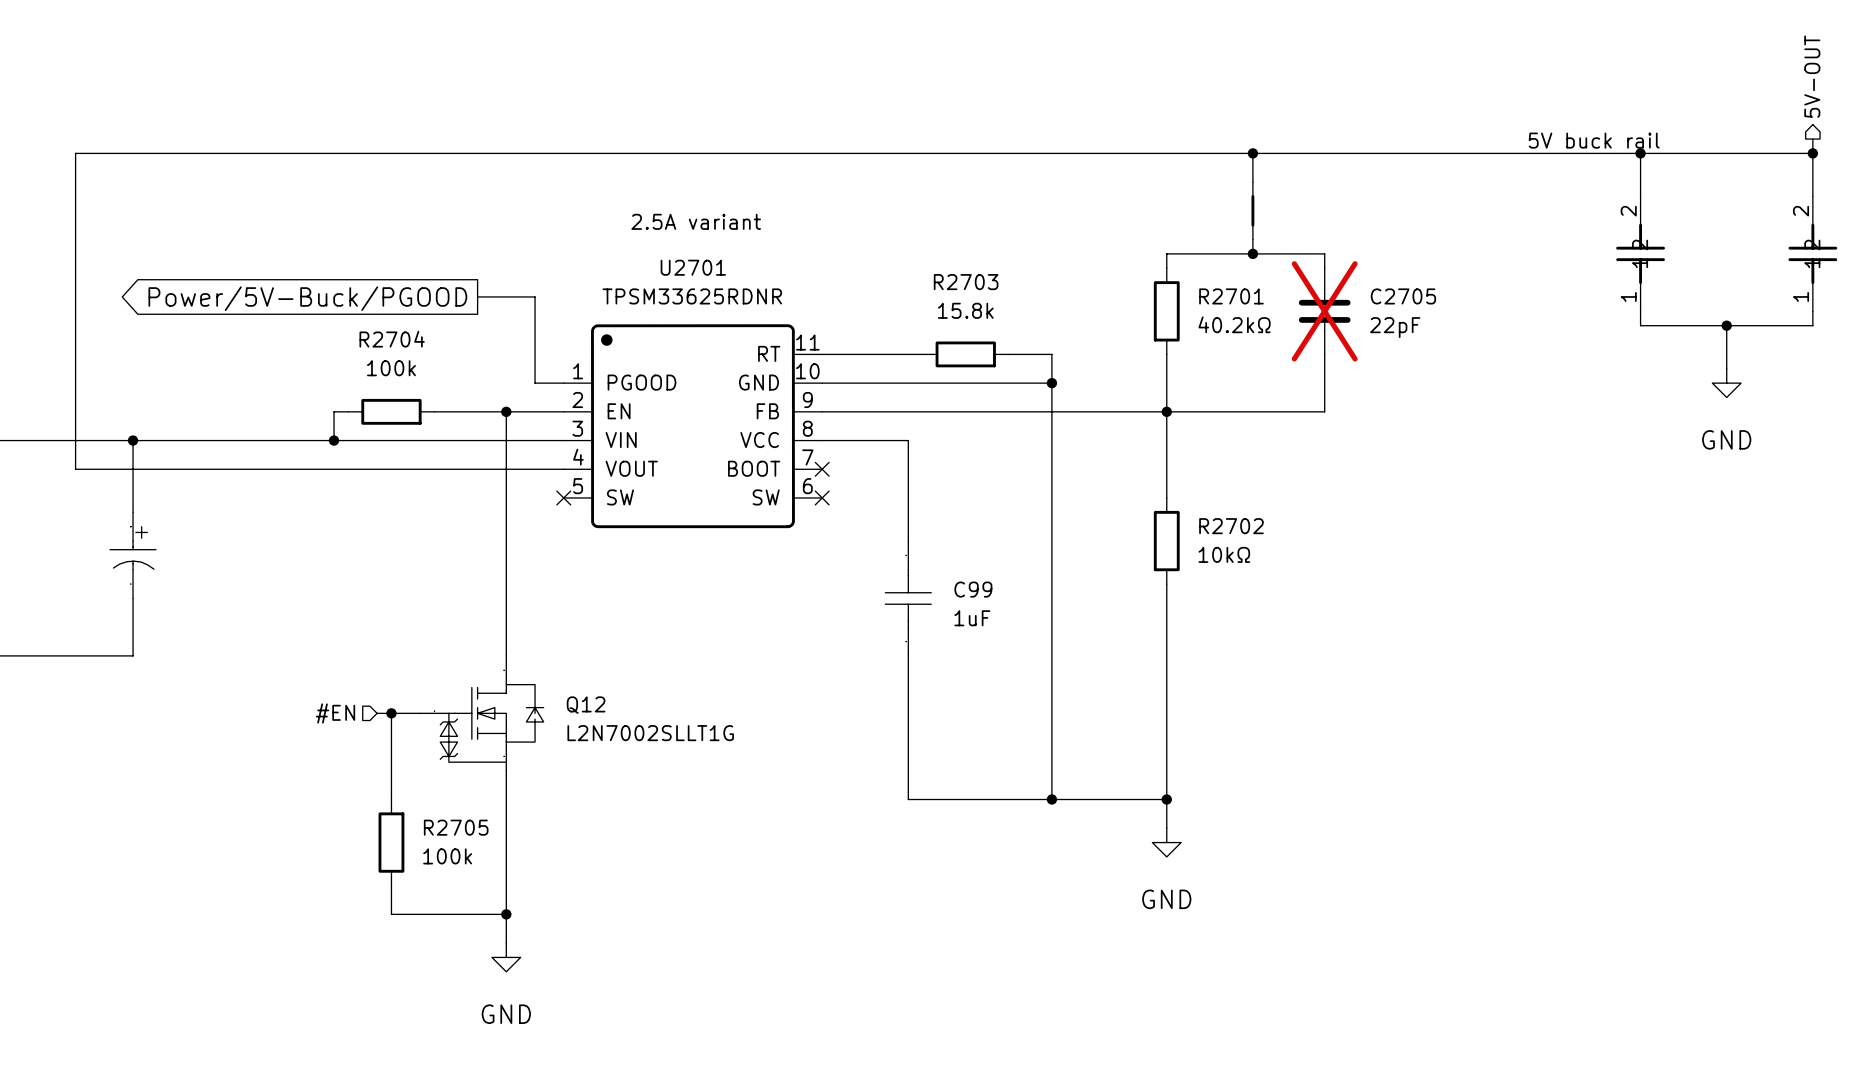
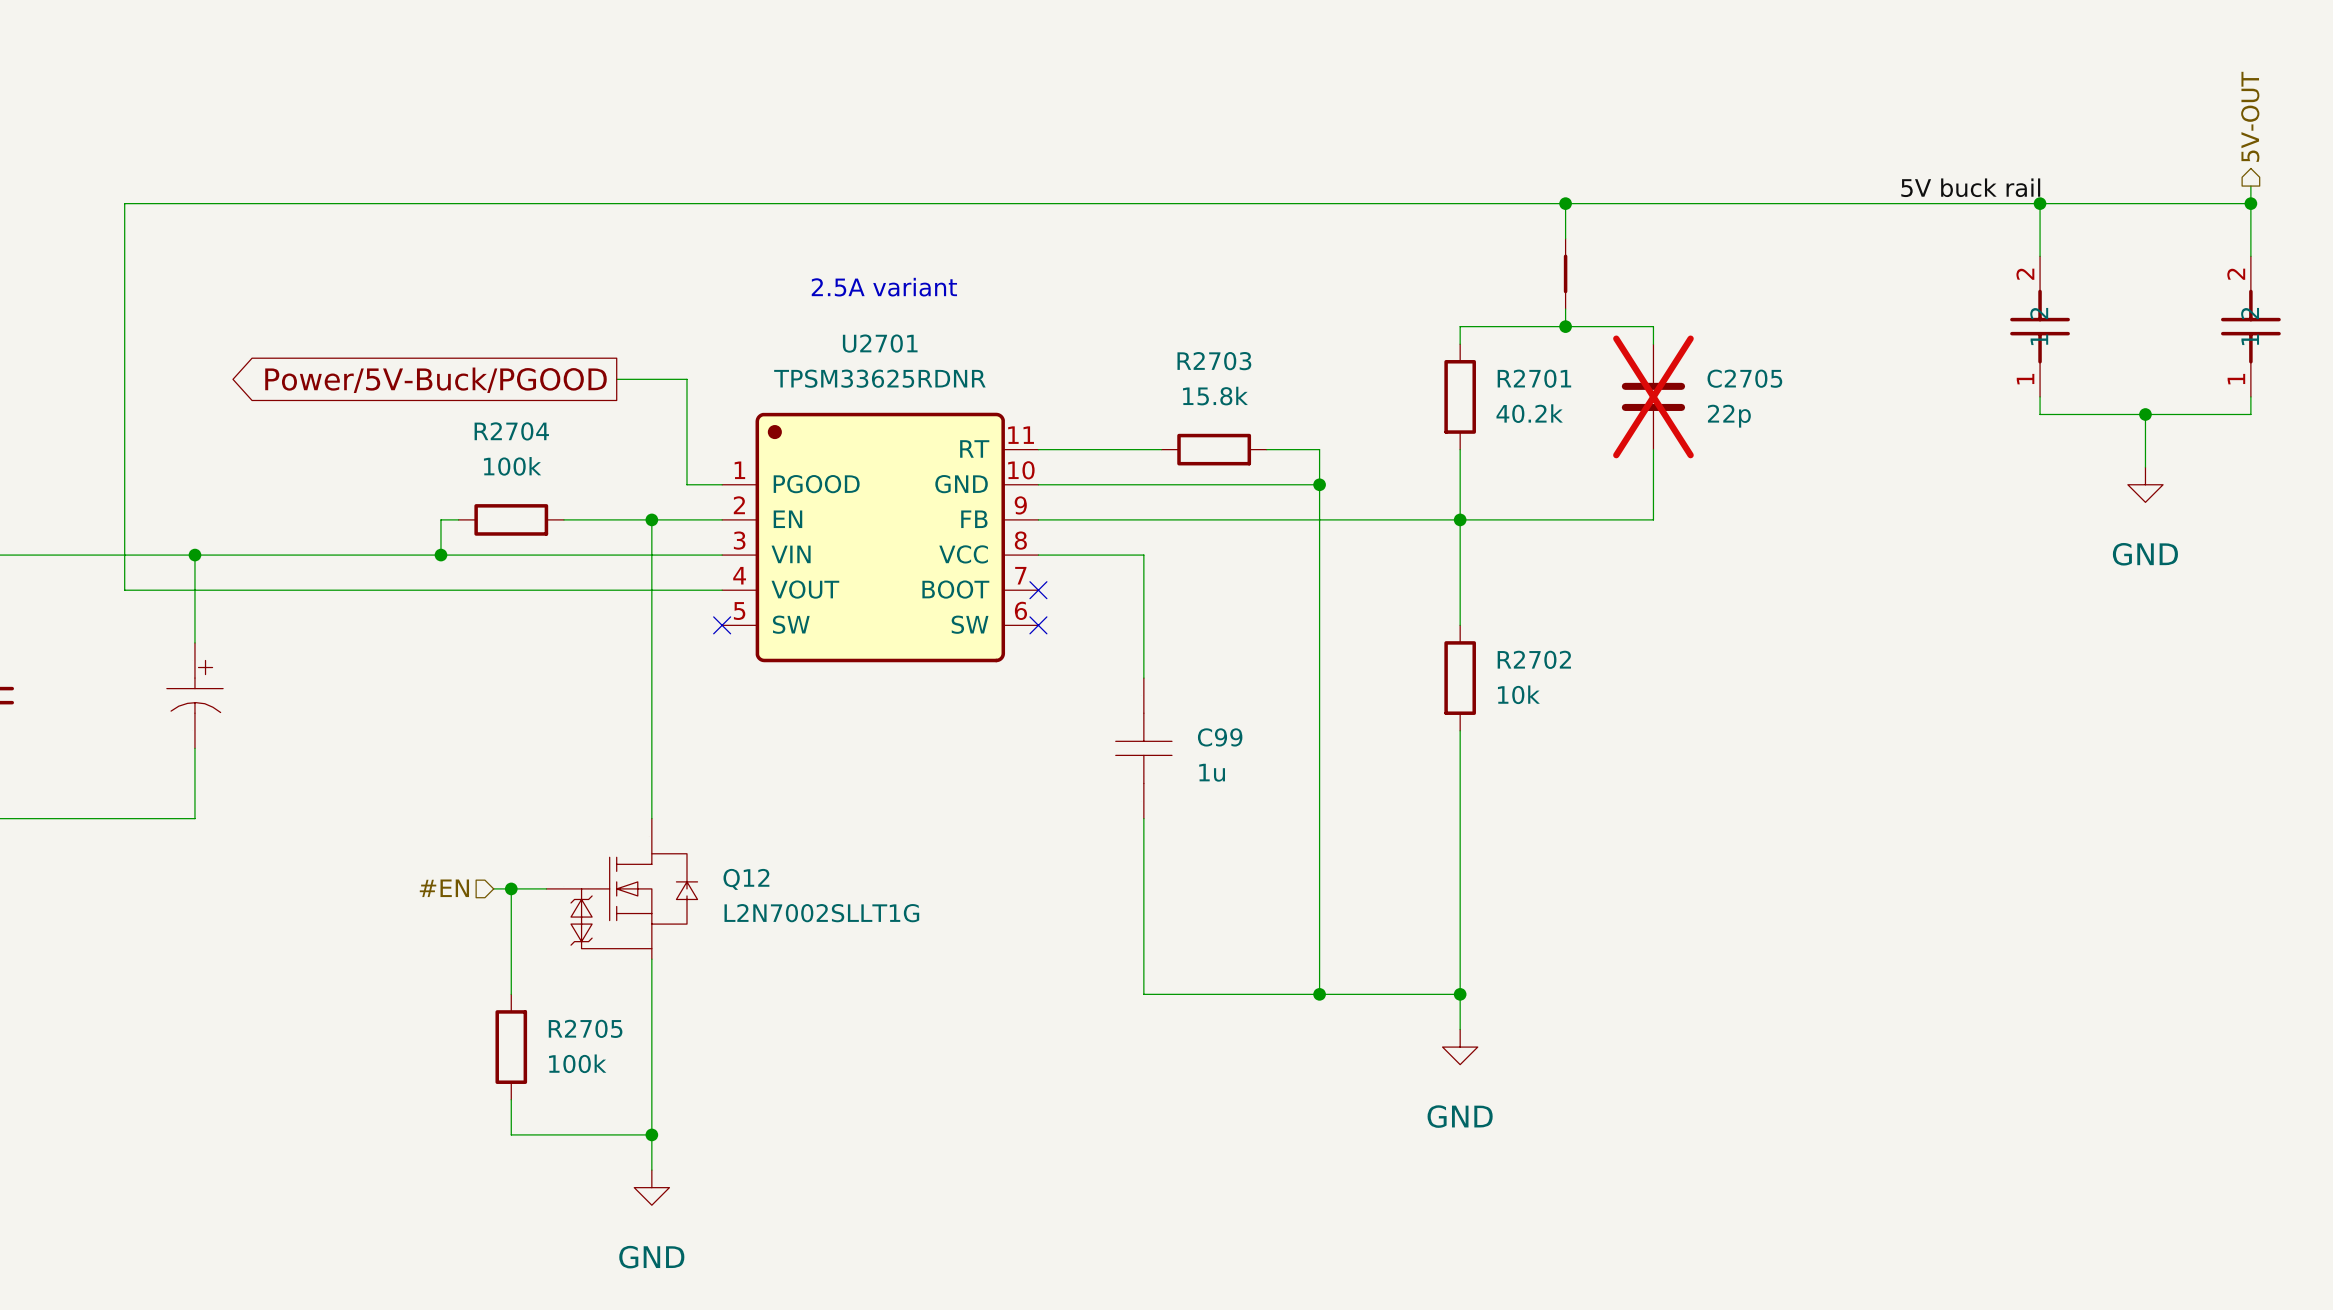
R2701 value: 40.2kΩ (1234, 324) -> 40.2k (1529, 413)
C2705 value: 22pF (1395, 327) -> 22p (1729, 416)
R2702 value: 10kΩ (1224, 554) -> 10k (1518, 694)
C99 value: 1uF (972, 618) -> 1u (1212, 772)

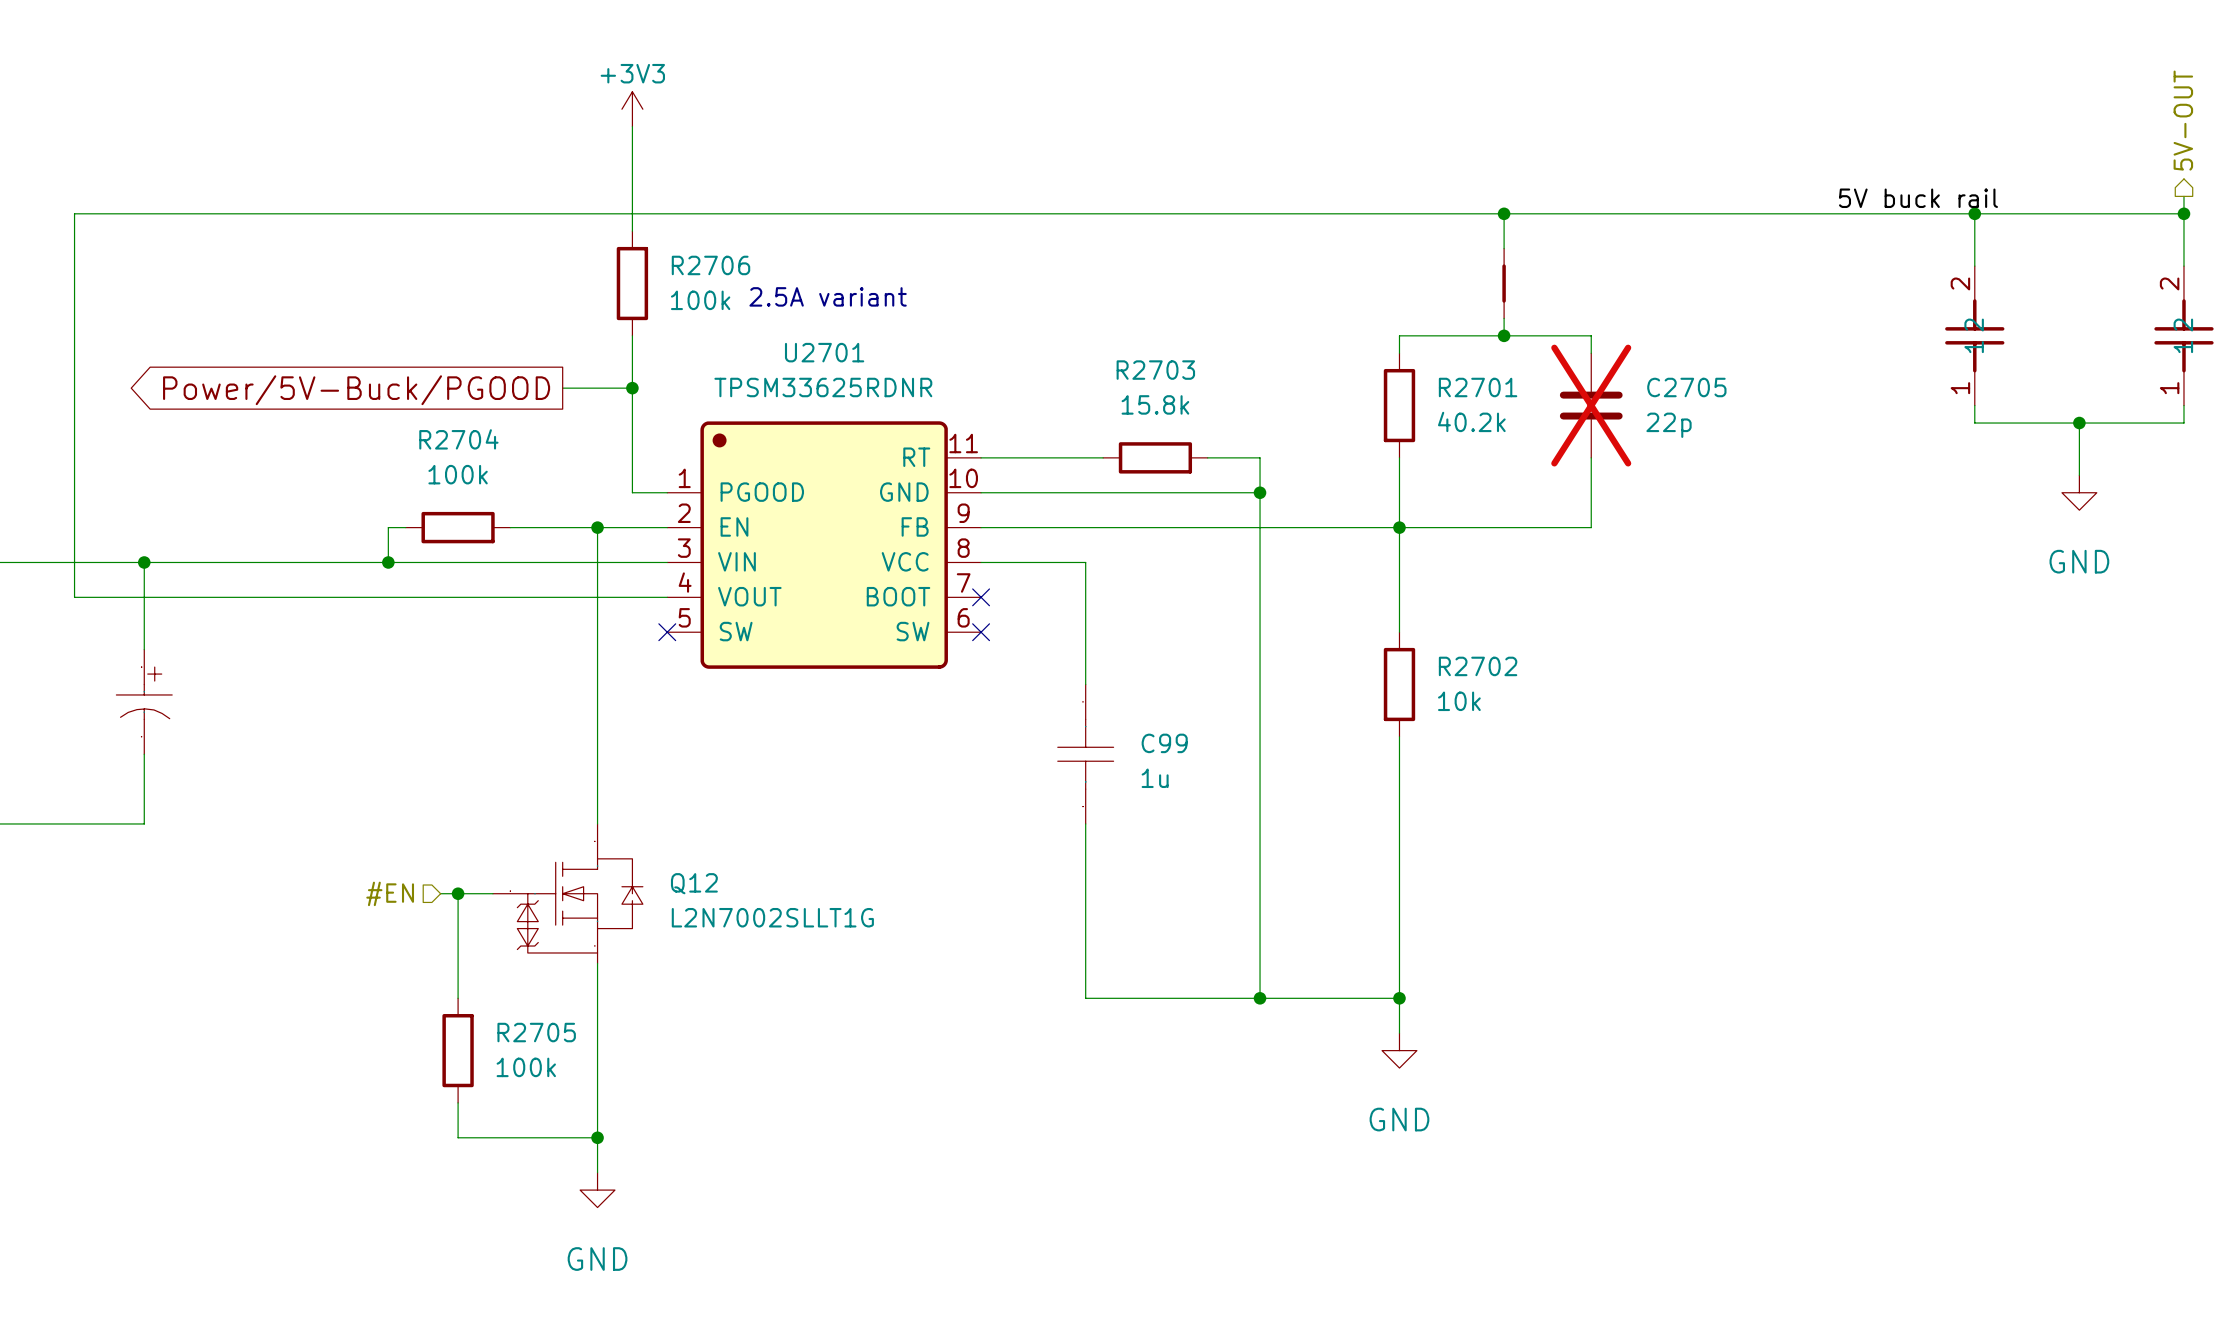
power symbol: none -> +3V3 (632, 109)
wire: none -> (632, 126) (632, 231)
R2706: none -> 100k (632, 283)
wire: none -> (632, 335) (632, 388)
junction: none -> (632, 388)

